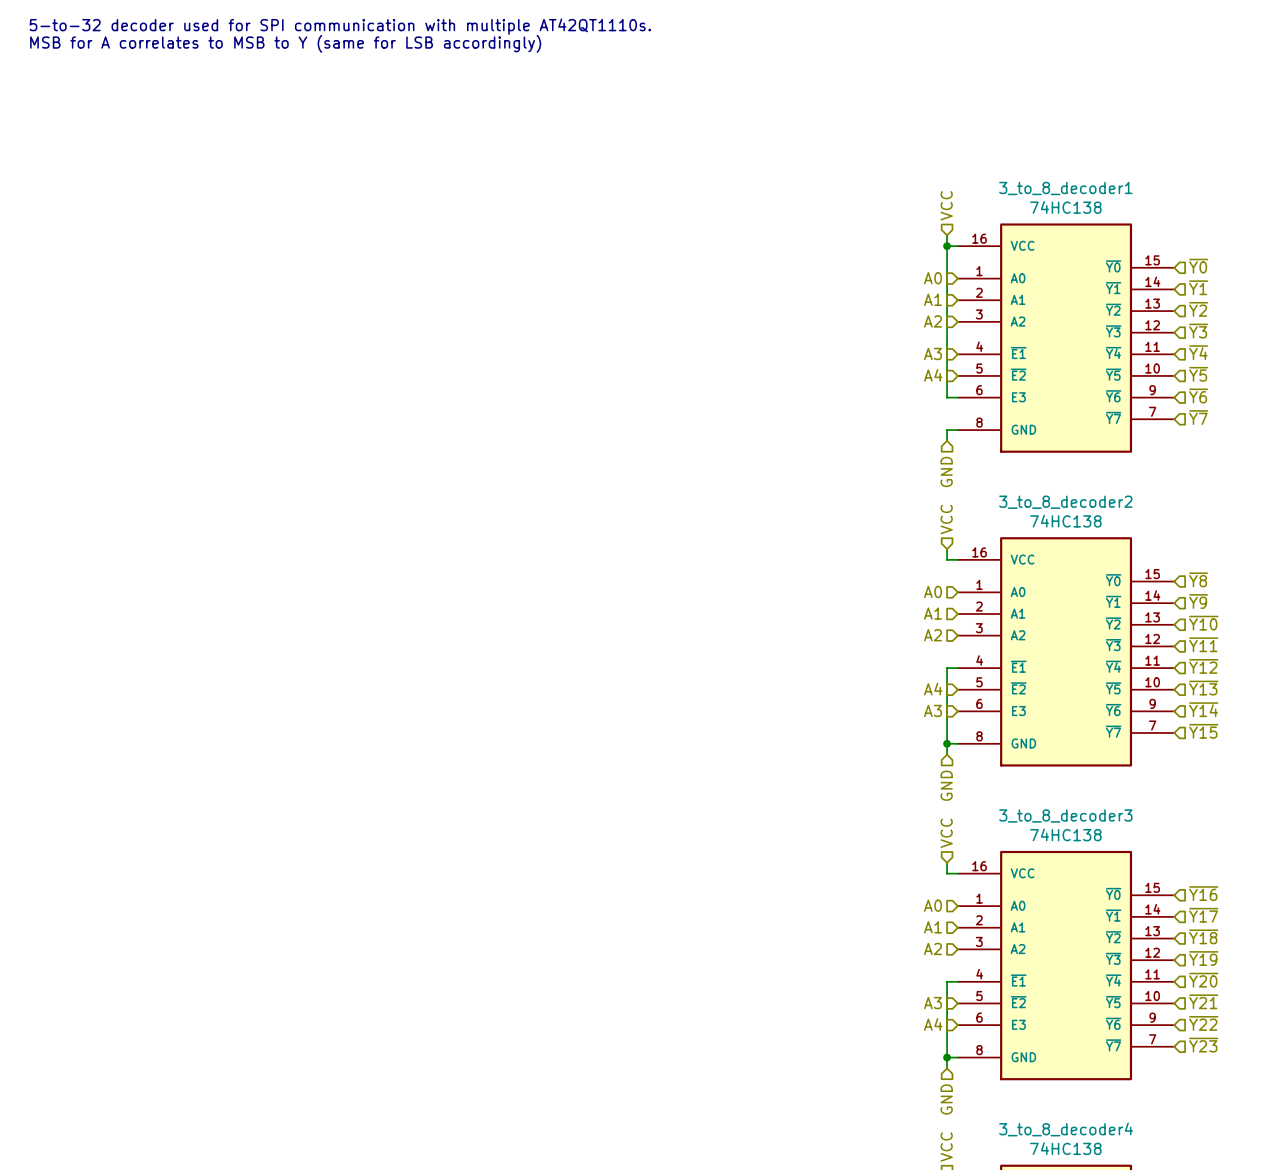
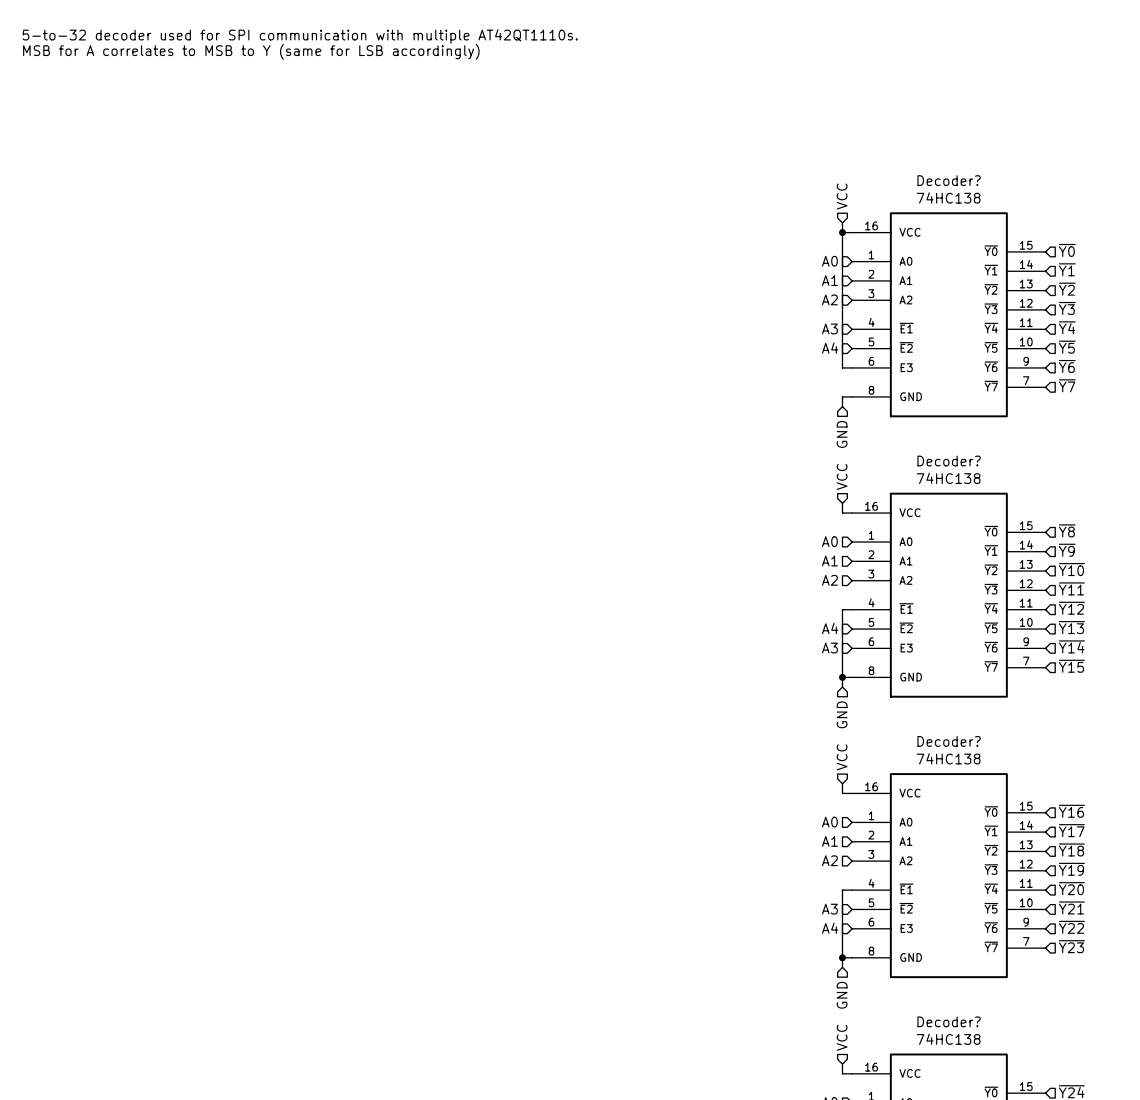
3_to_8_decoder1 name: 3_to_8_decoder1 (1065, 188) -> Decoder? (949, 180)
3_to_8_decoder2 name: 3_to_8_decoder2 (1065, 502) -> Decoder? (949, 461)
3_to_8_decoder3 name: 3_to_8_decoder3 (1065, 815) -> Decoder? (949, 741)
3_to_8_decoder4 name: 3_to_8_decoder4 (1066, 1129) -> Decoder? (949, 1021)

